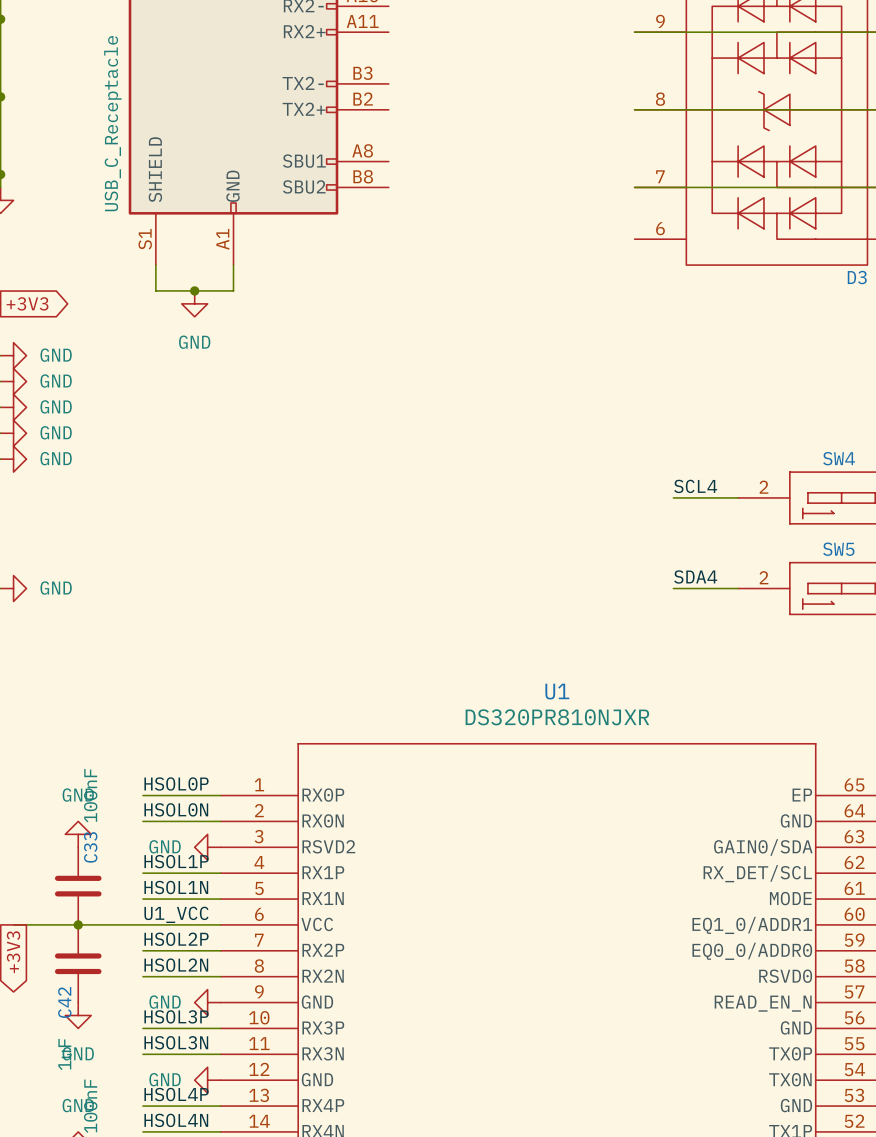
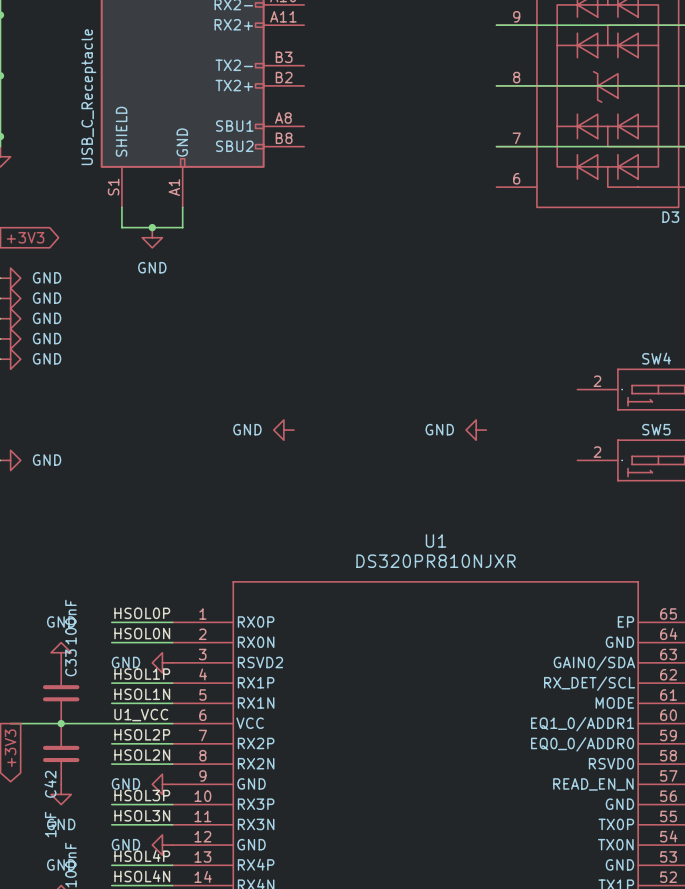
label: SCL4 (695, 486) -> none
wire: (673, 497) (738, 497) -> none
power symbol: none -> GND (283, 430)
power symbol: none -> GND (476, 430)
label: SDA4 (695, 576) -> none
wire: (673, 588) (738, 588) -> none

